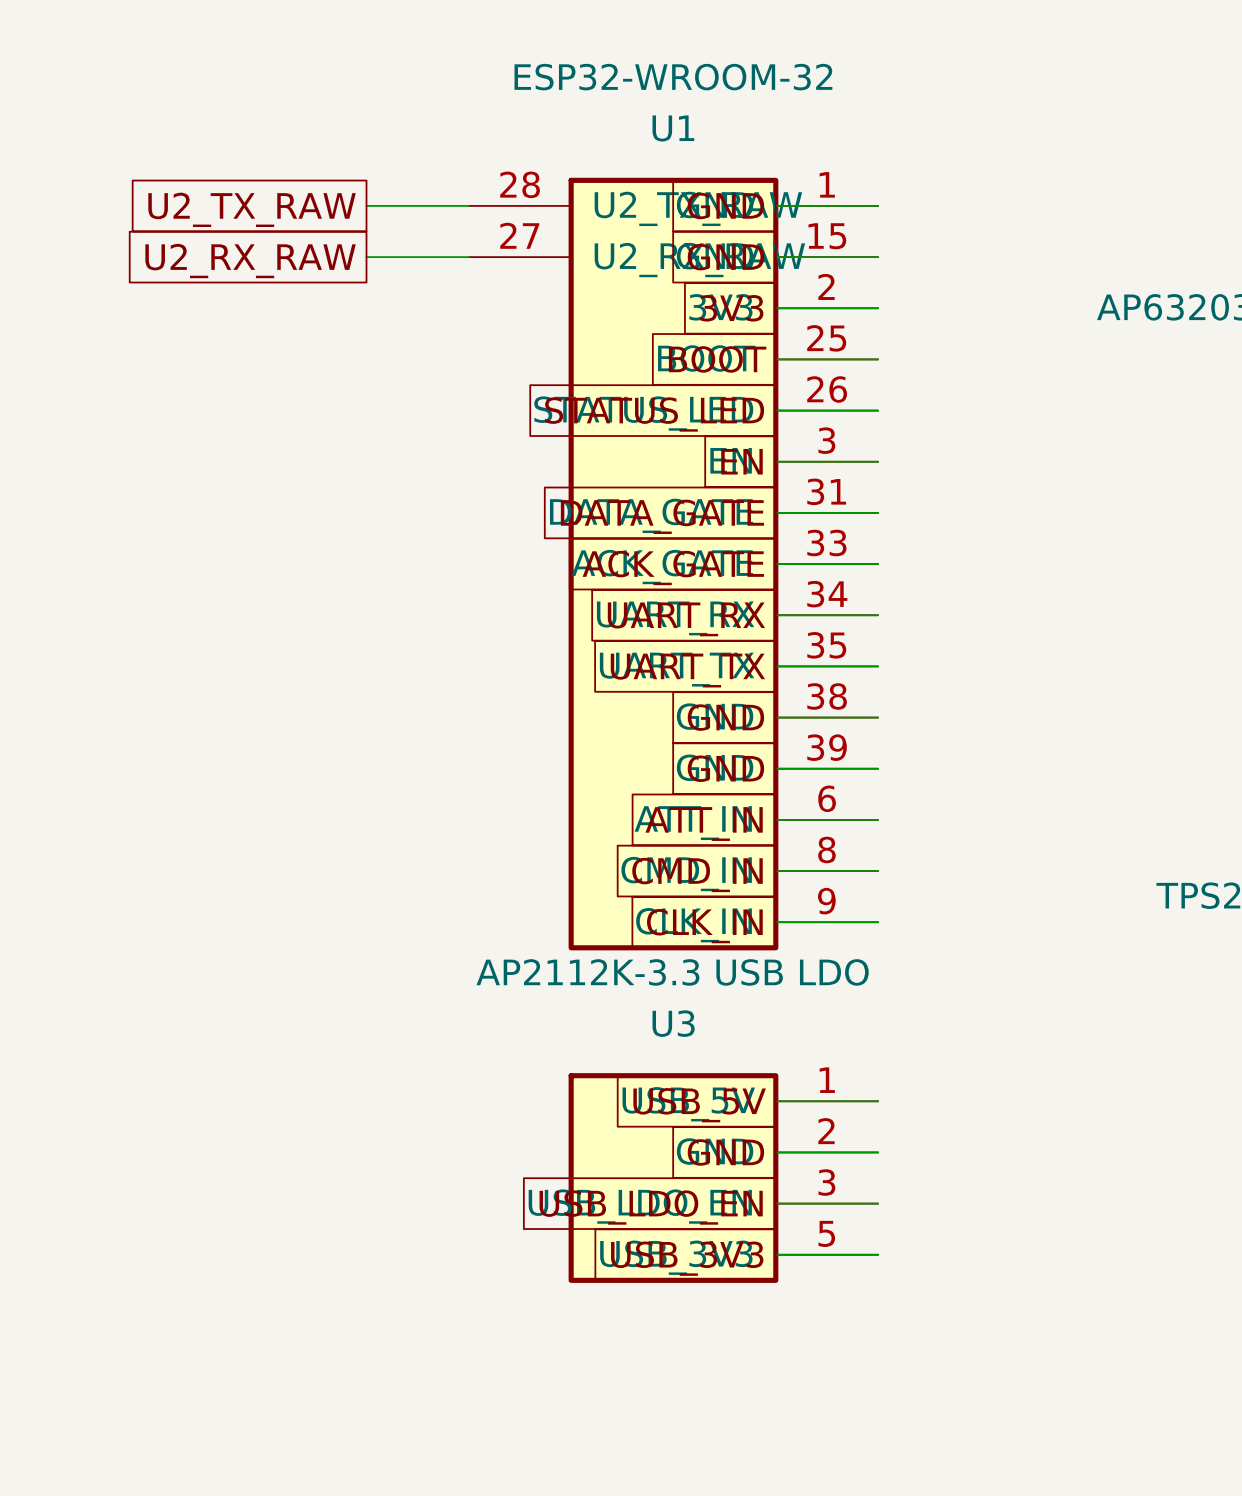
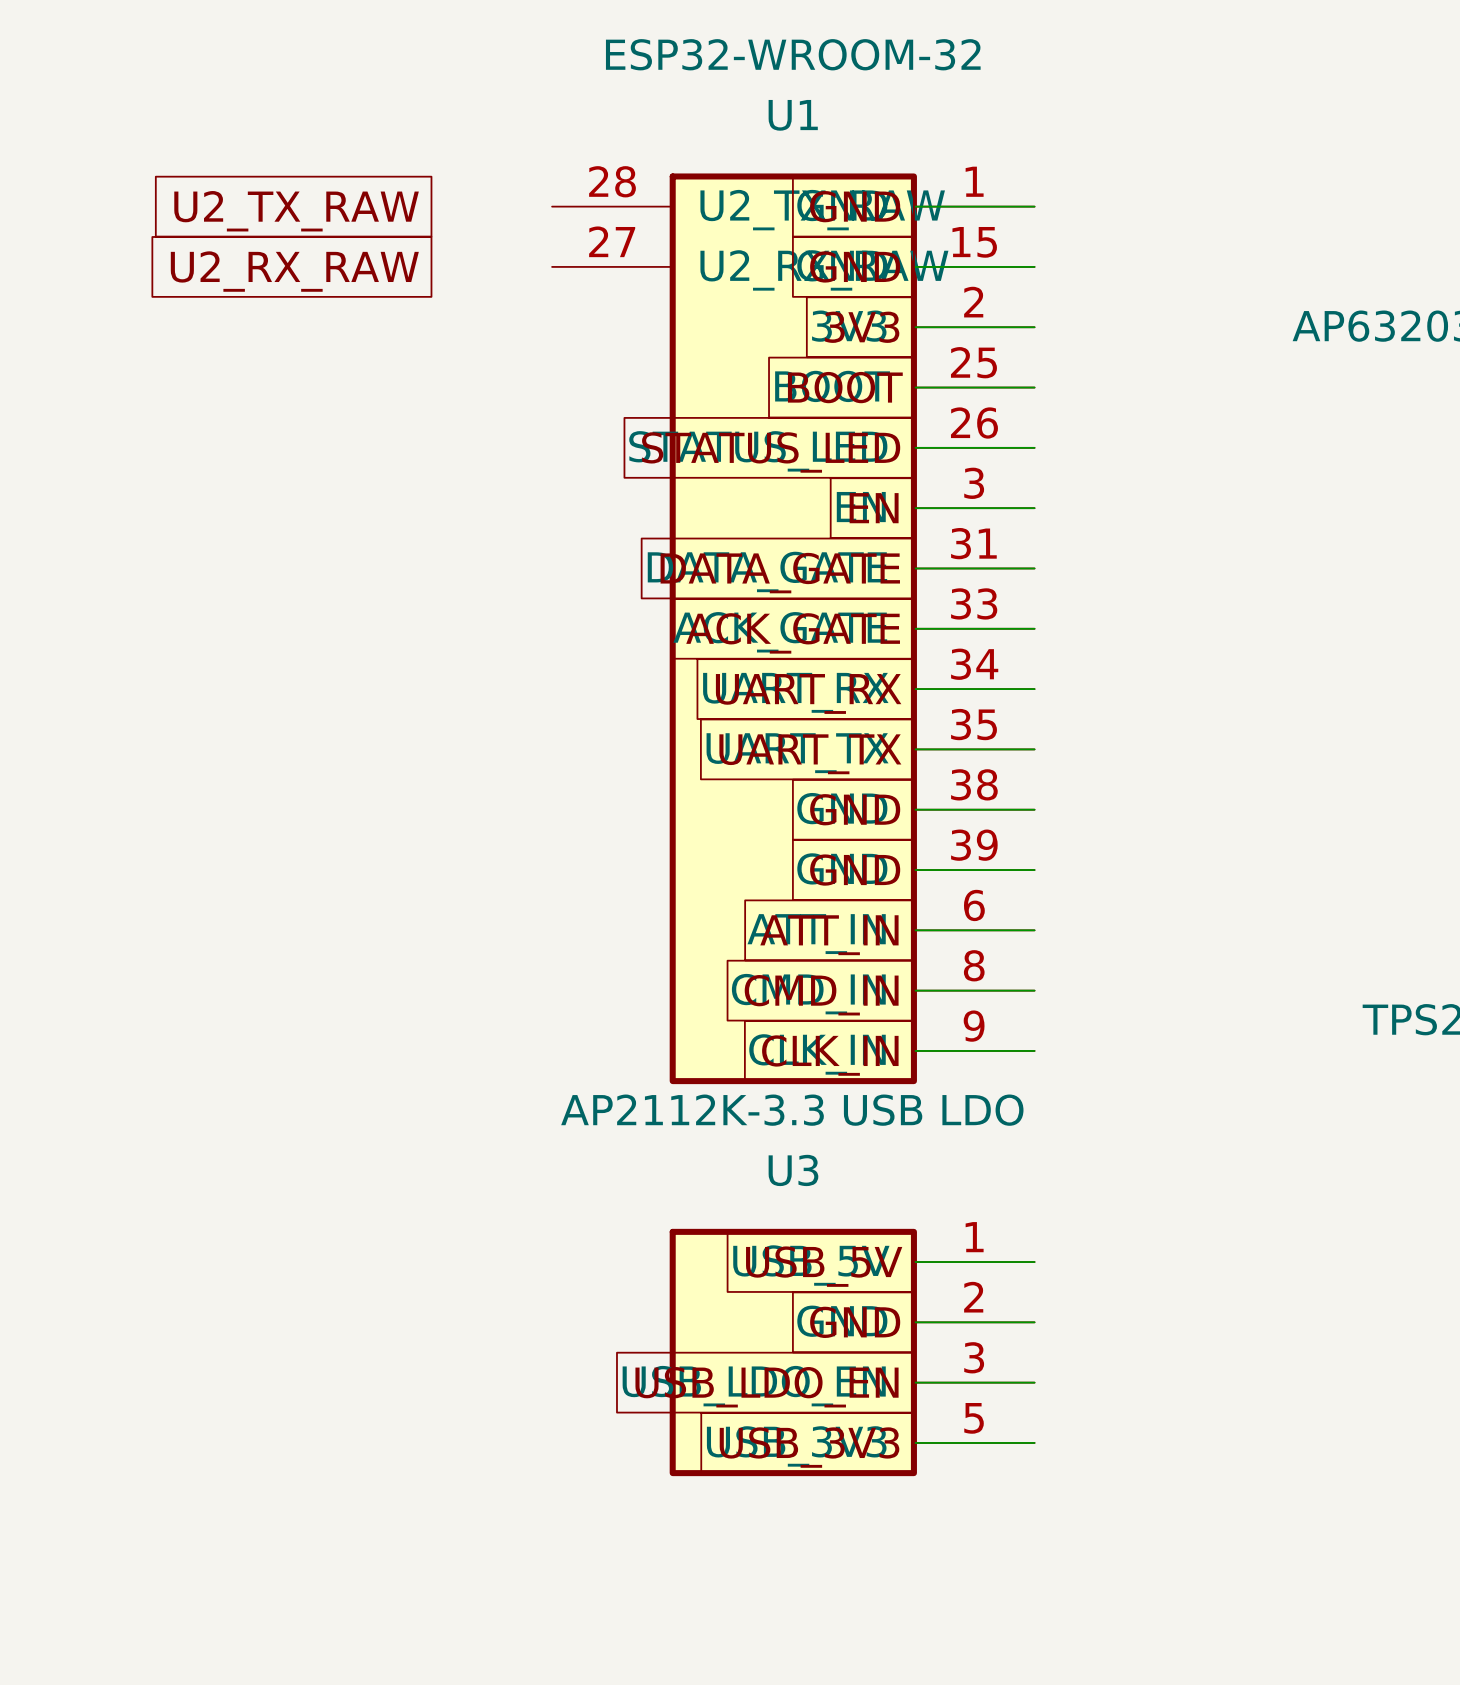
wire: (366, 205) (468, 205) -> none
wire: (366, 257) (468, 257) -> none

